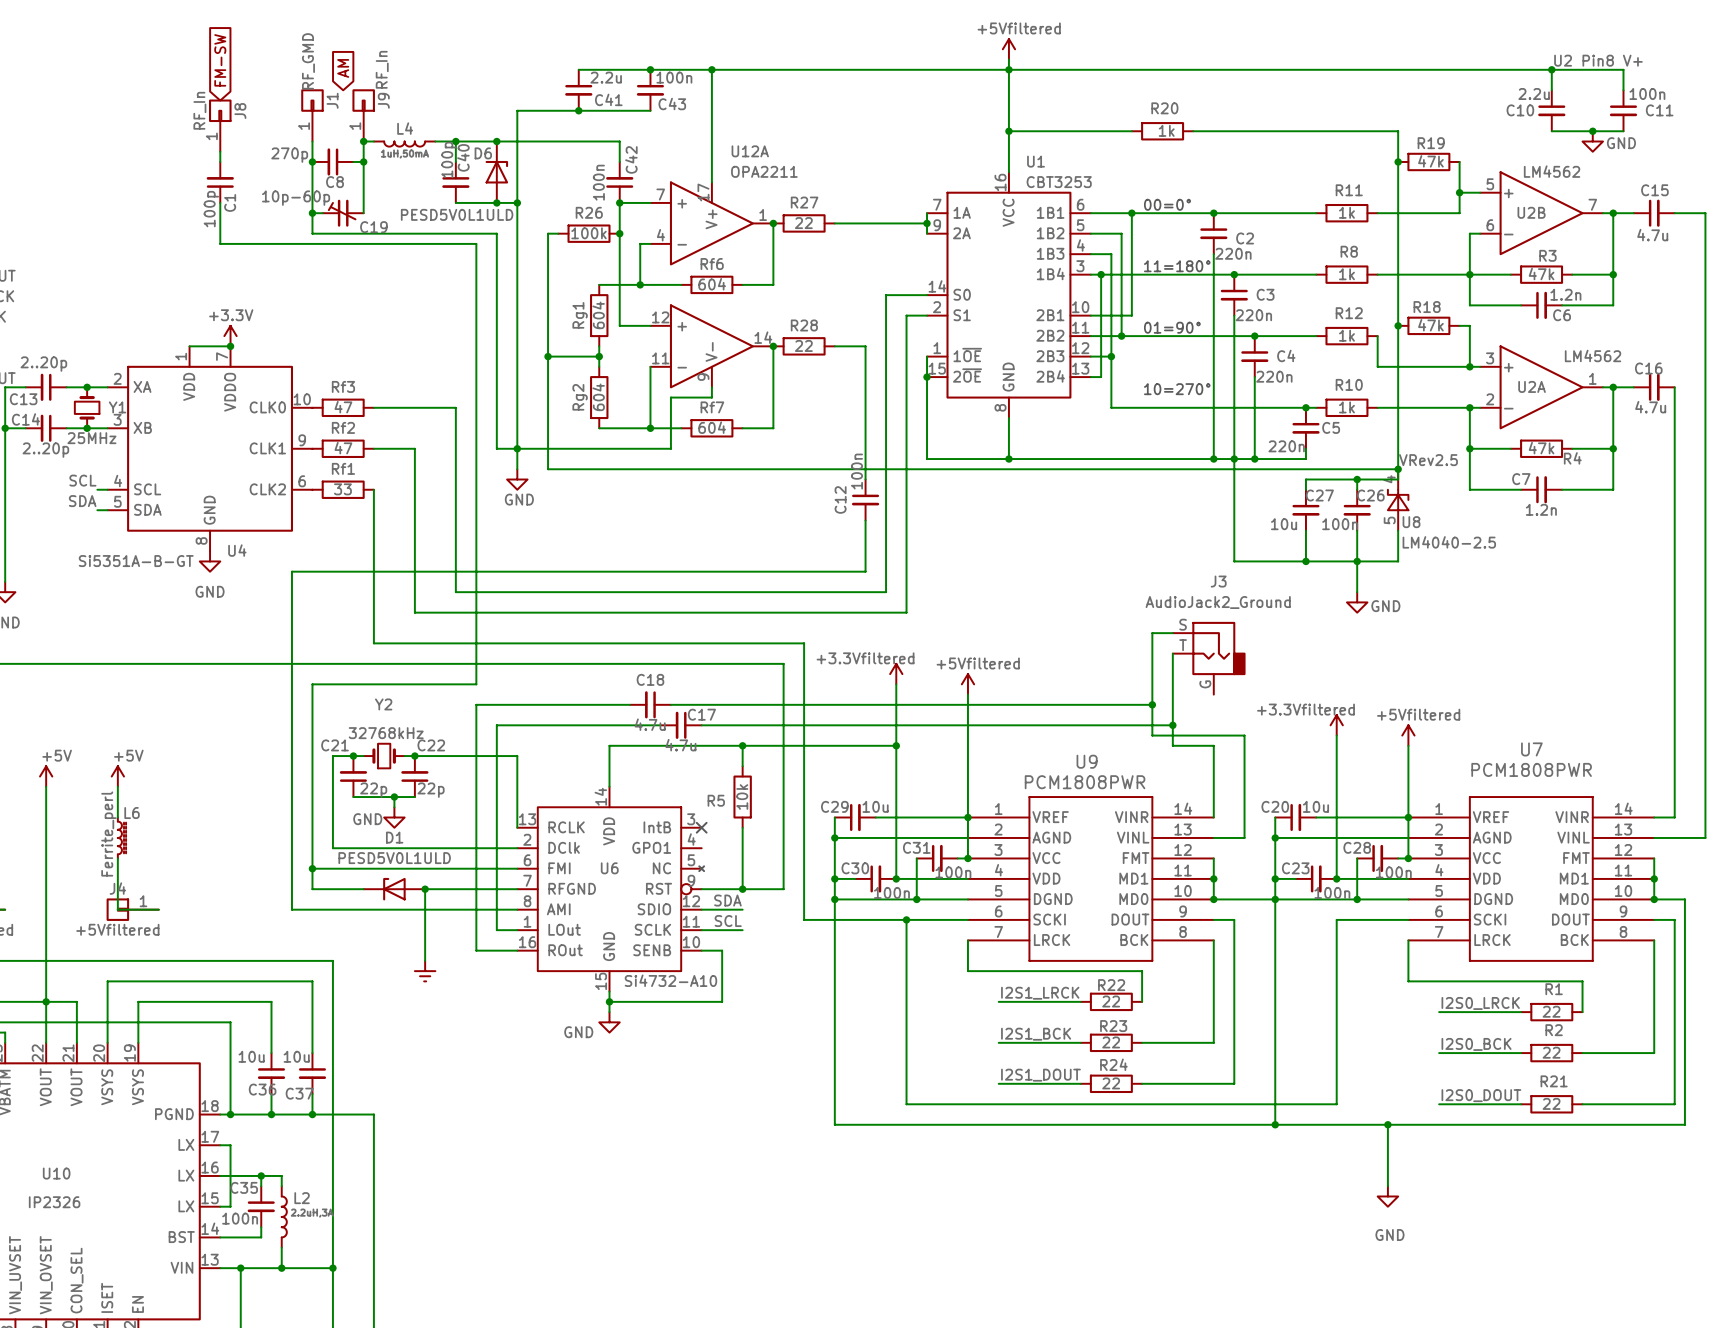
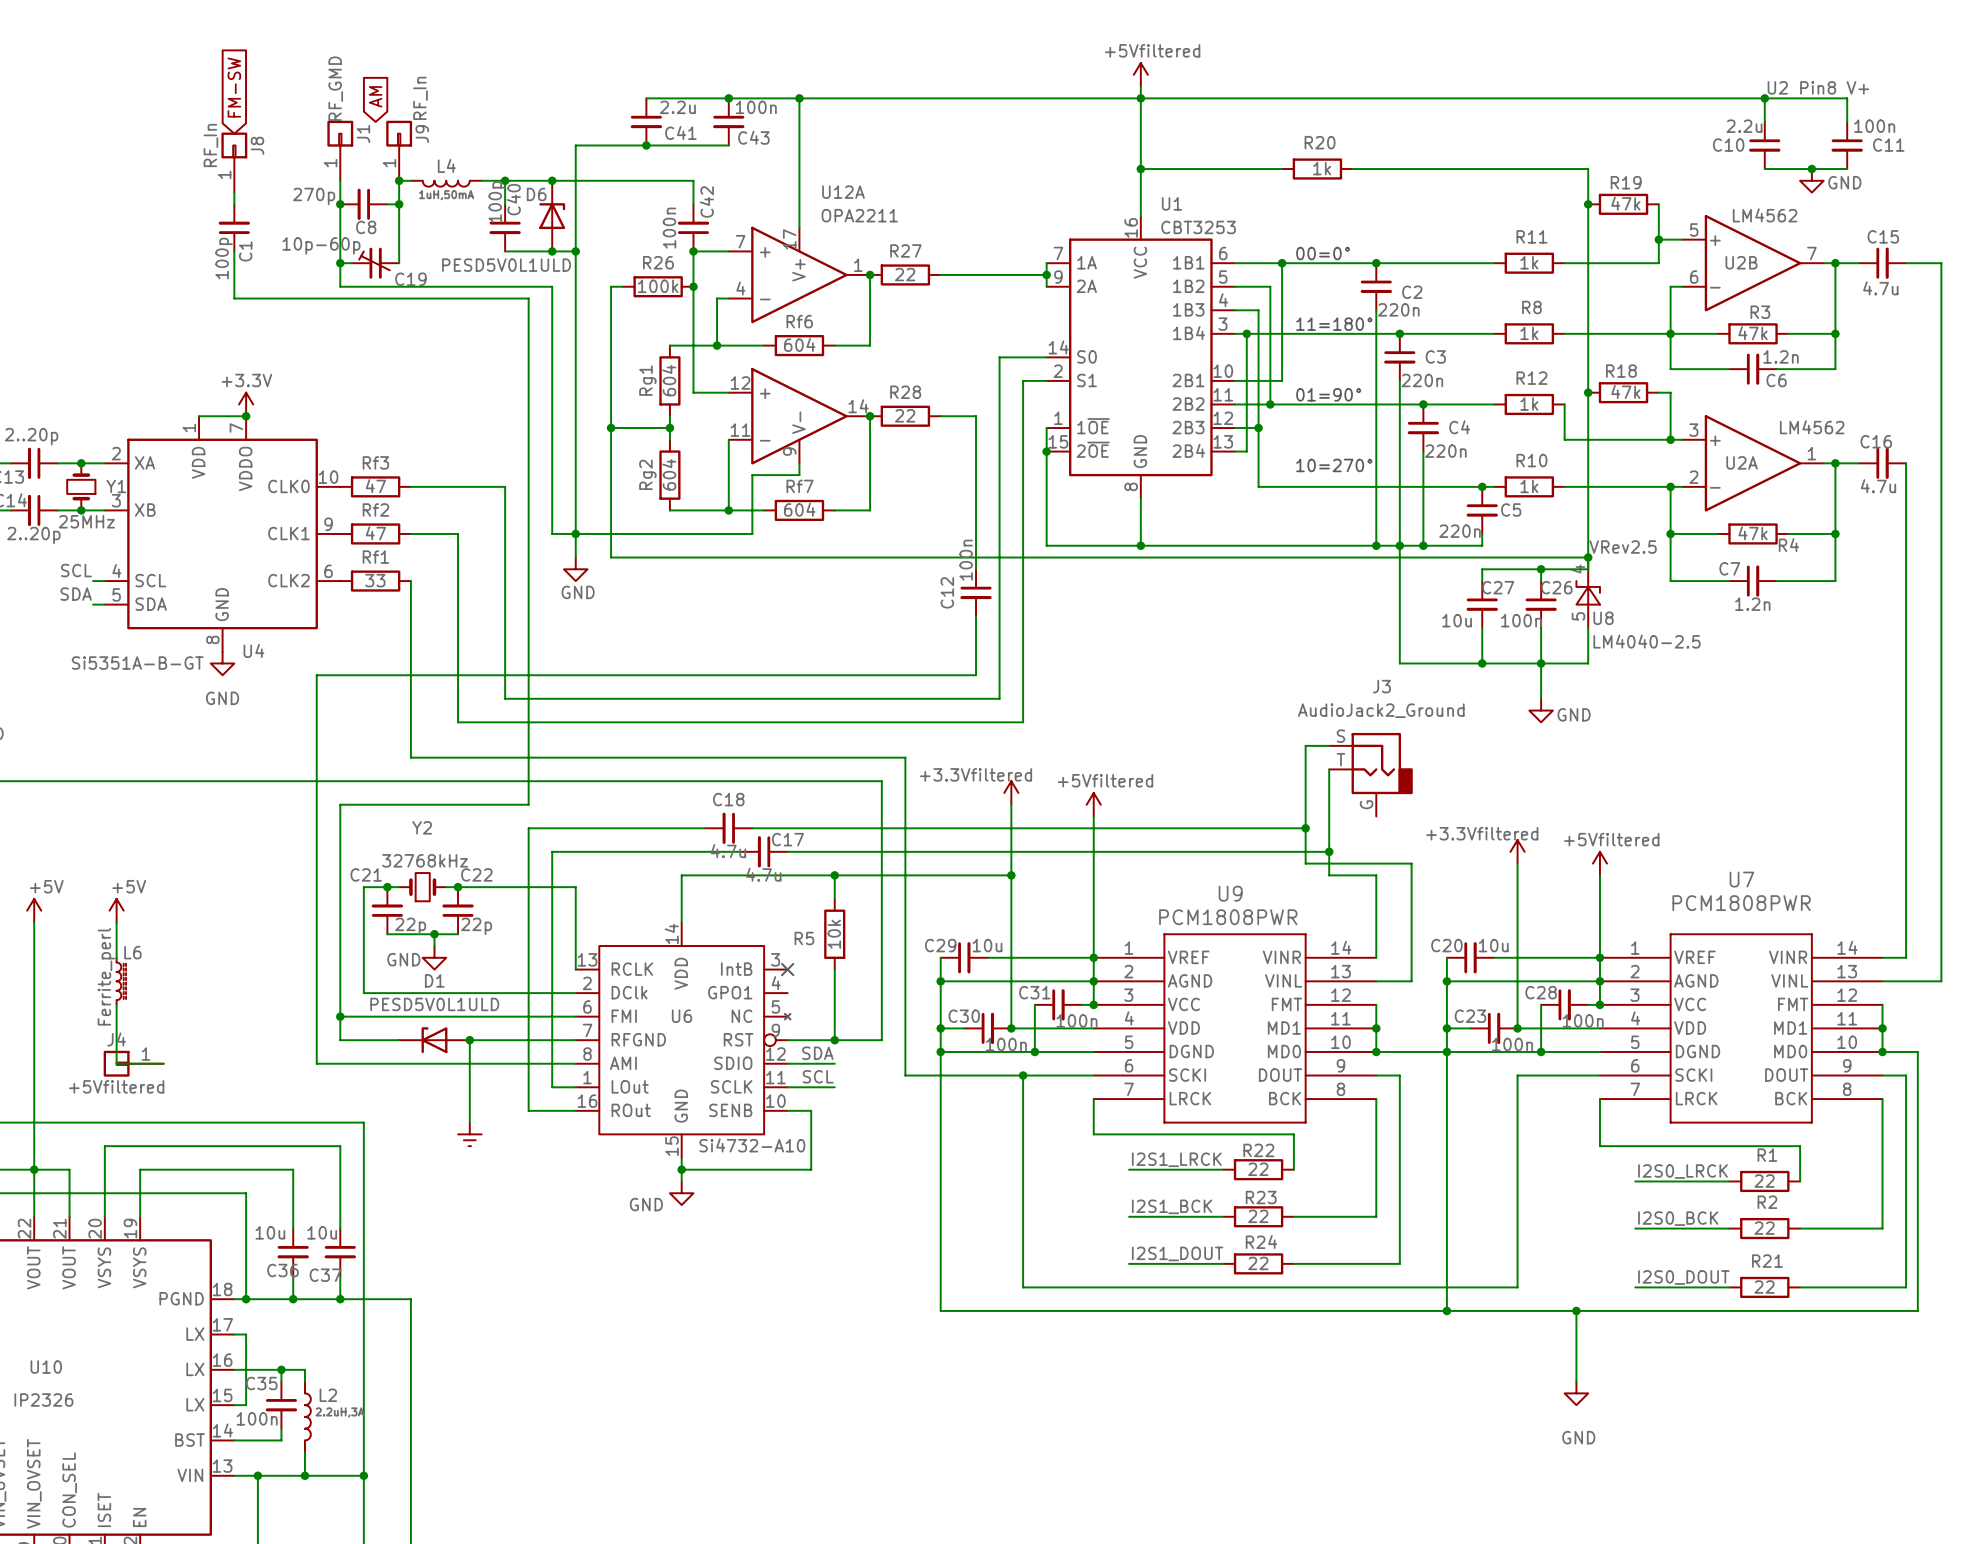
junction: none -> (1093, 981)
junction: none -> (1599, 981)

